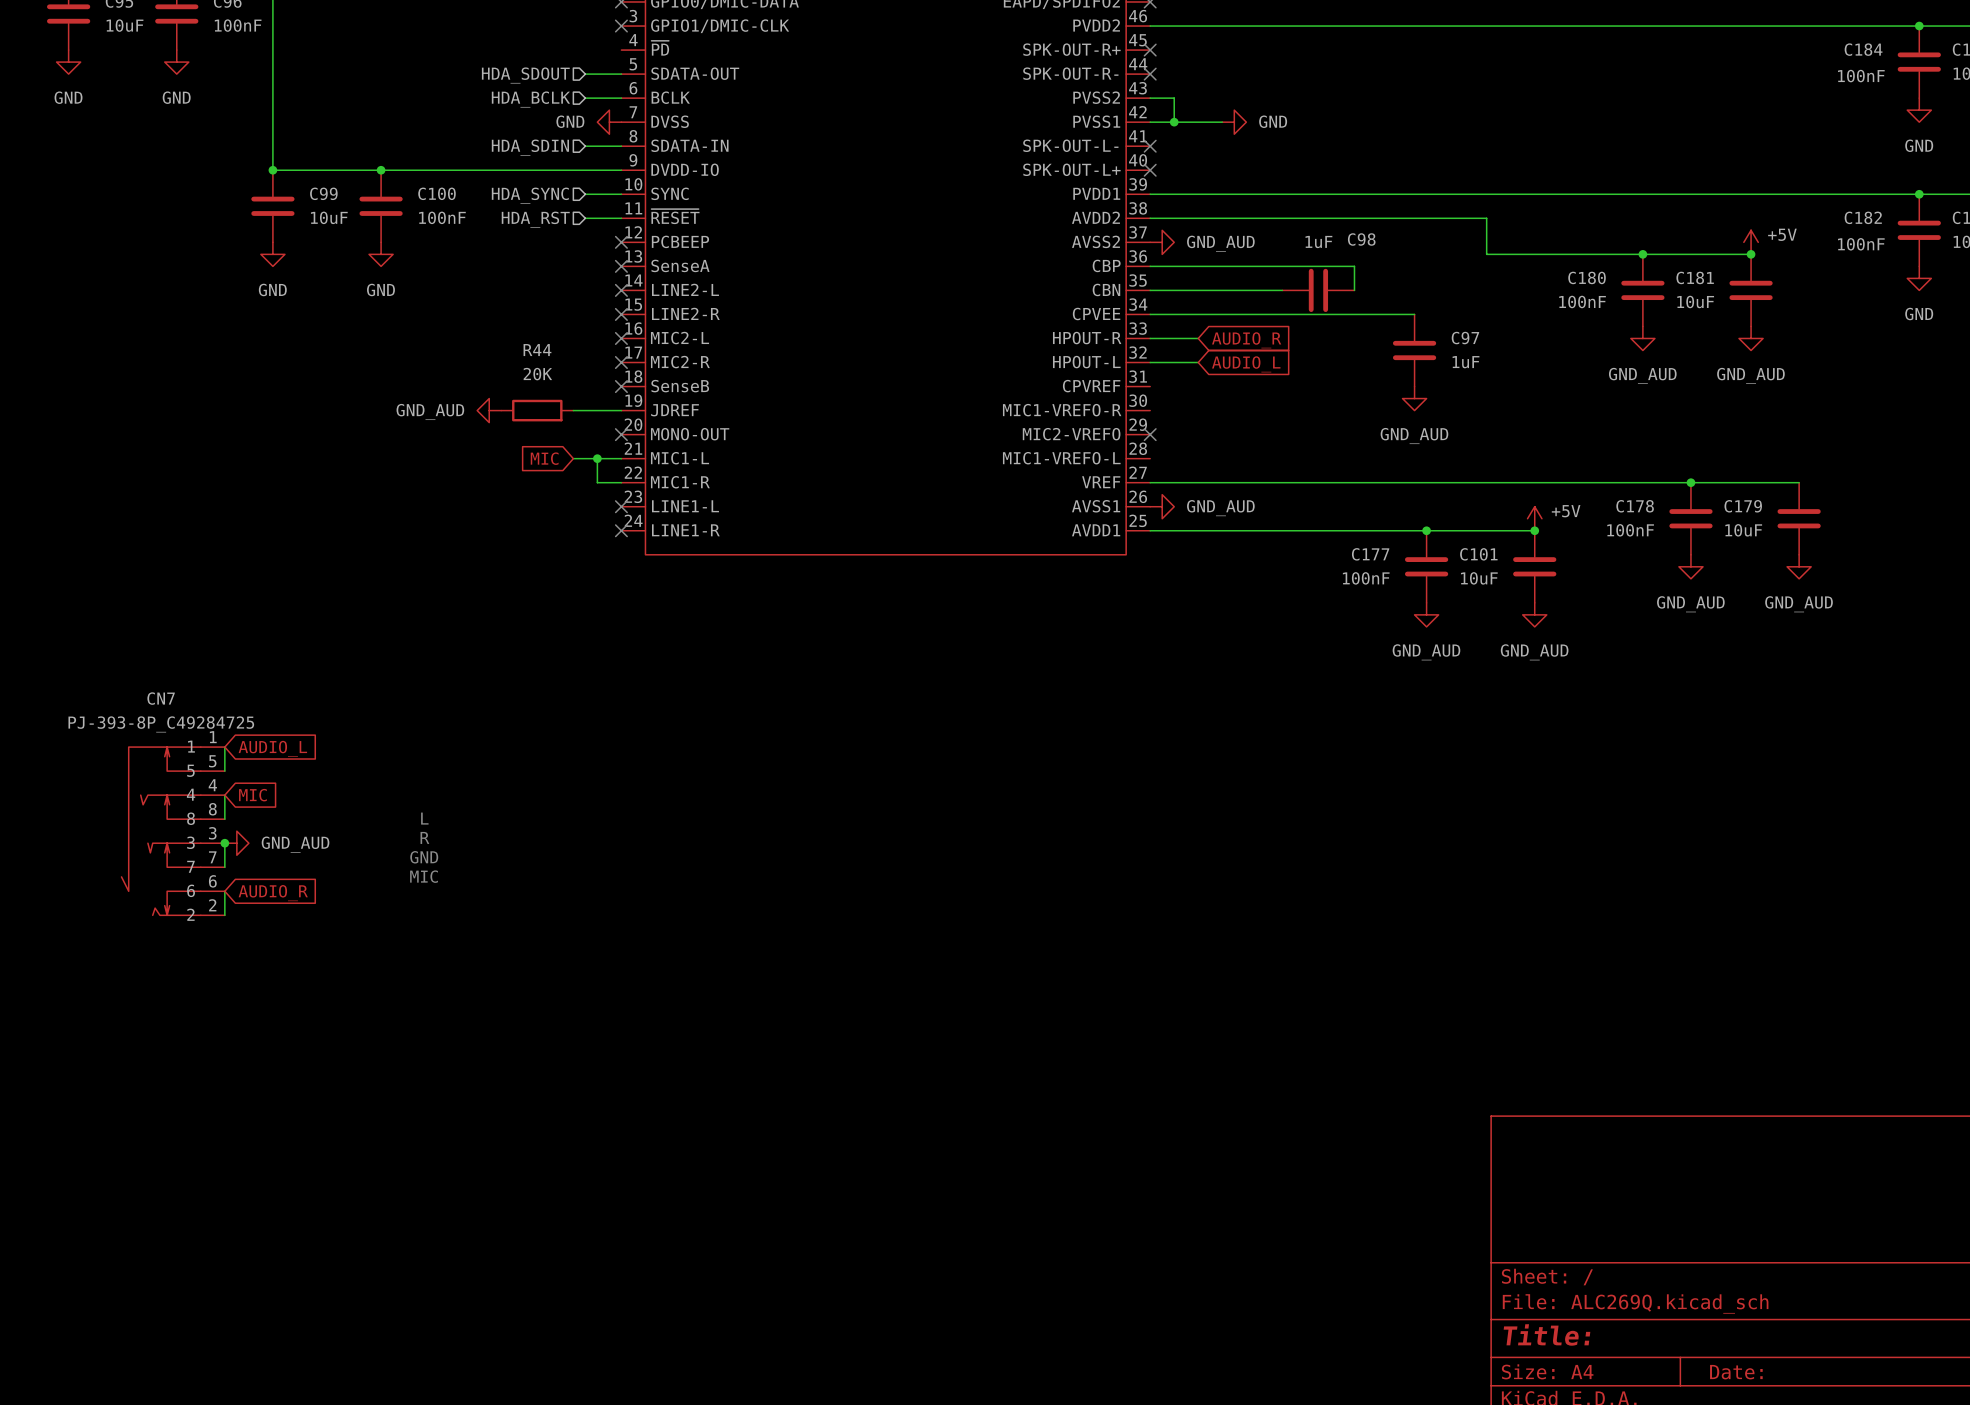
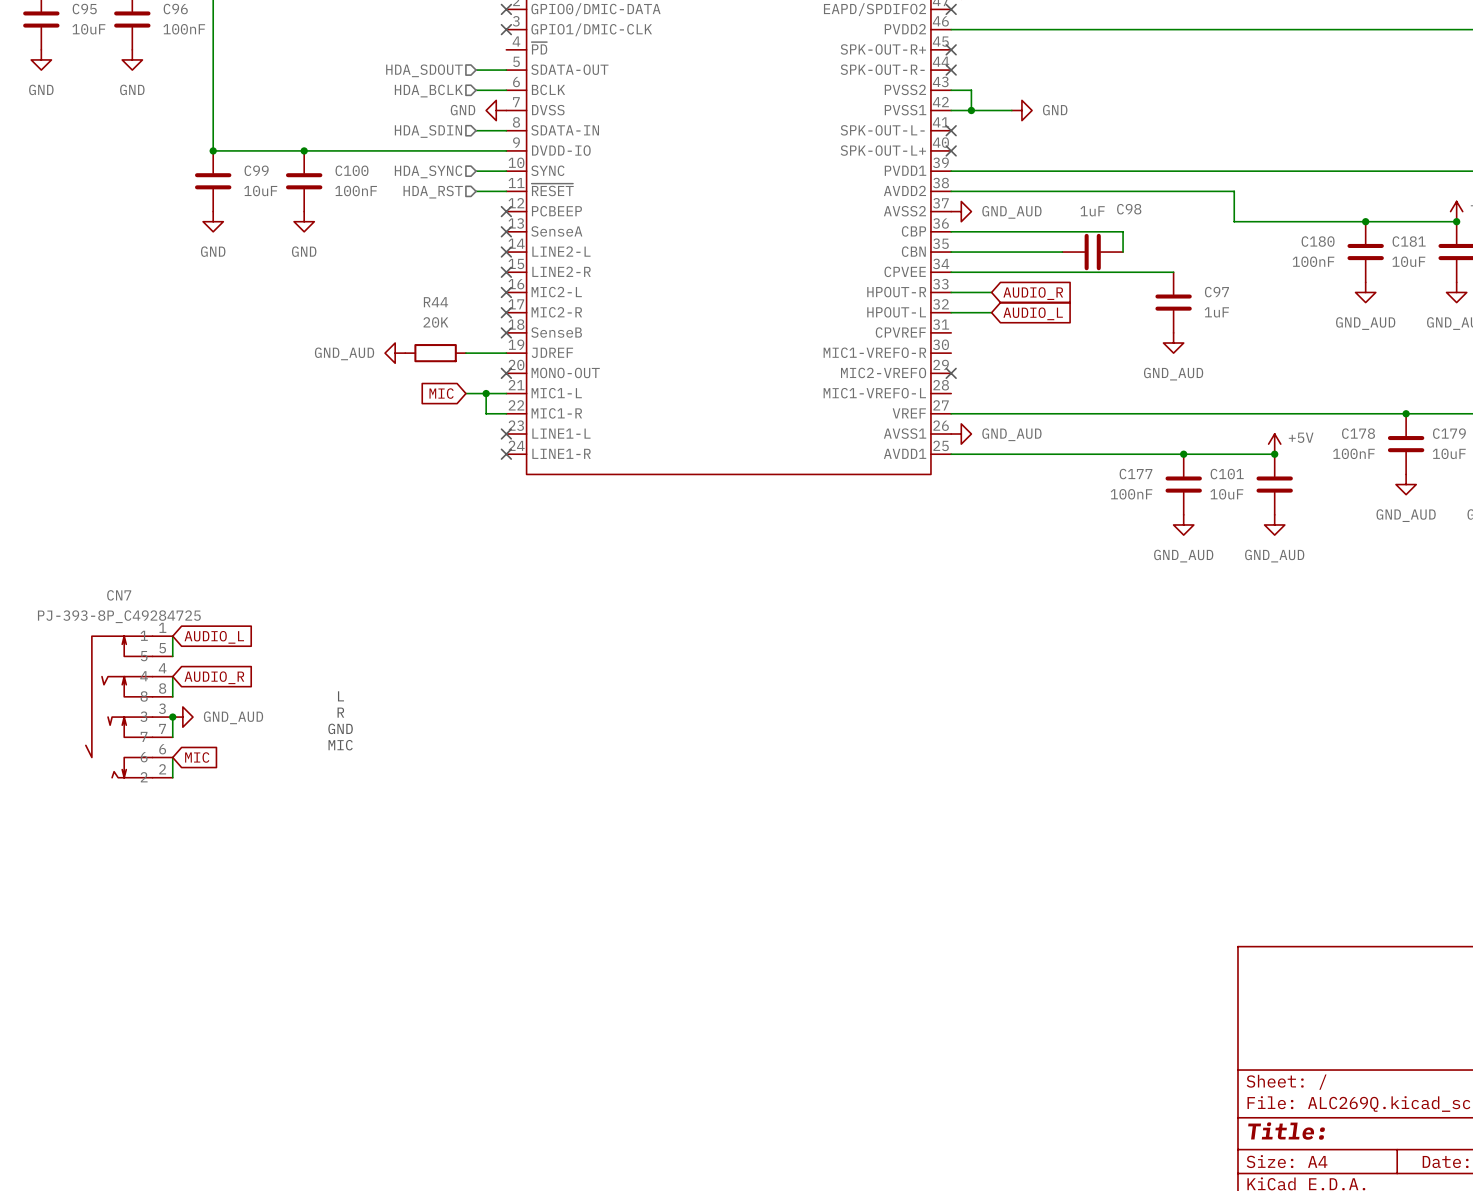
global label: MIC (252, 795) -> AUDIO_R (214, 677)
global label: AUDIO_R (273, 893) -> MIC (197, 757)

